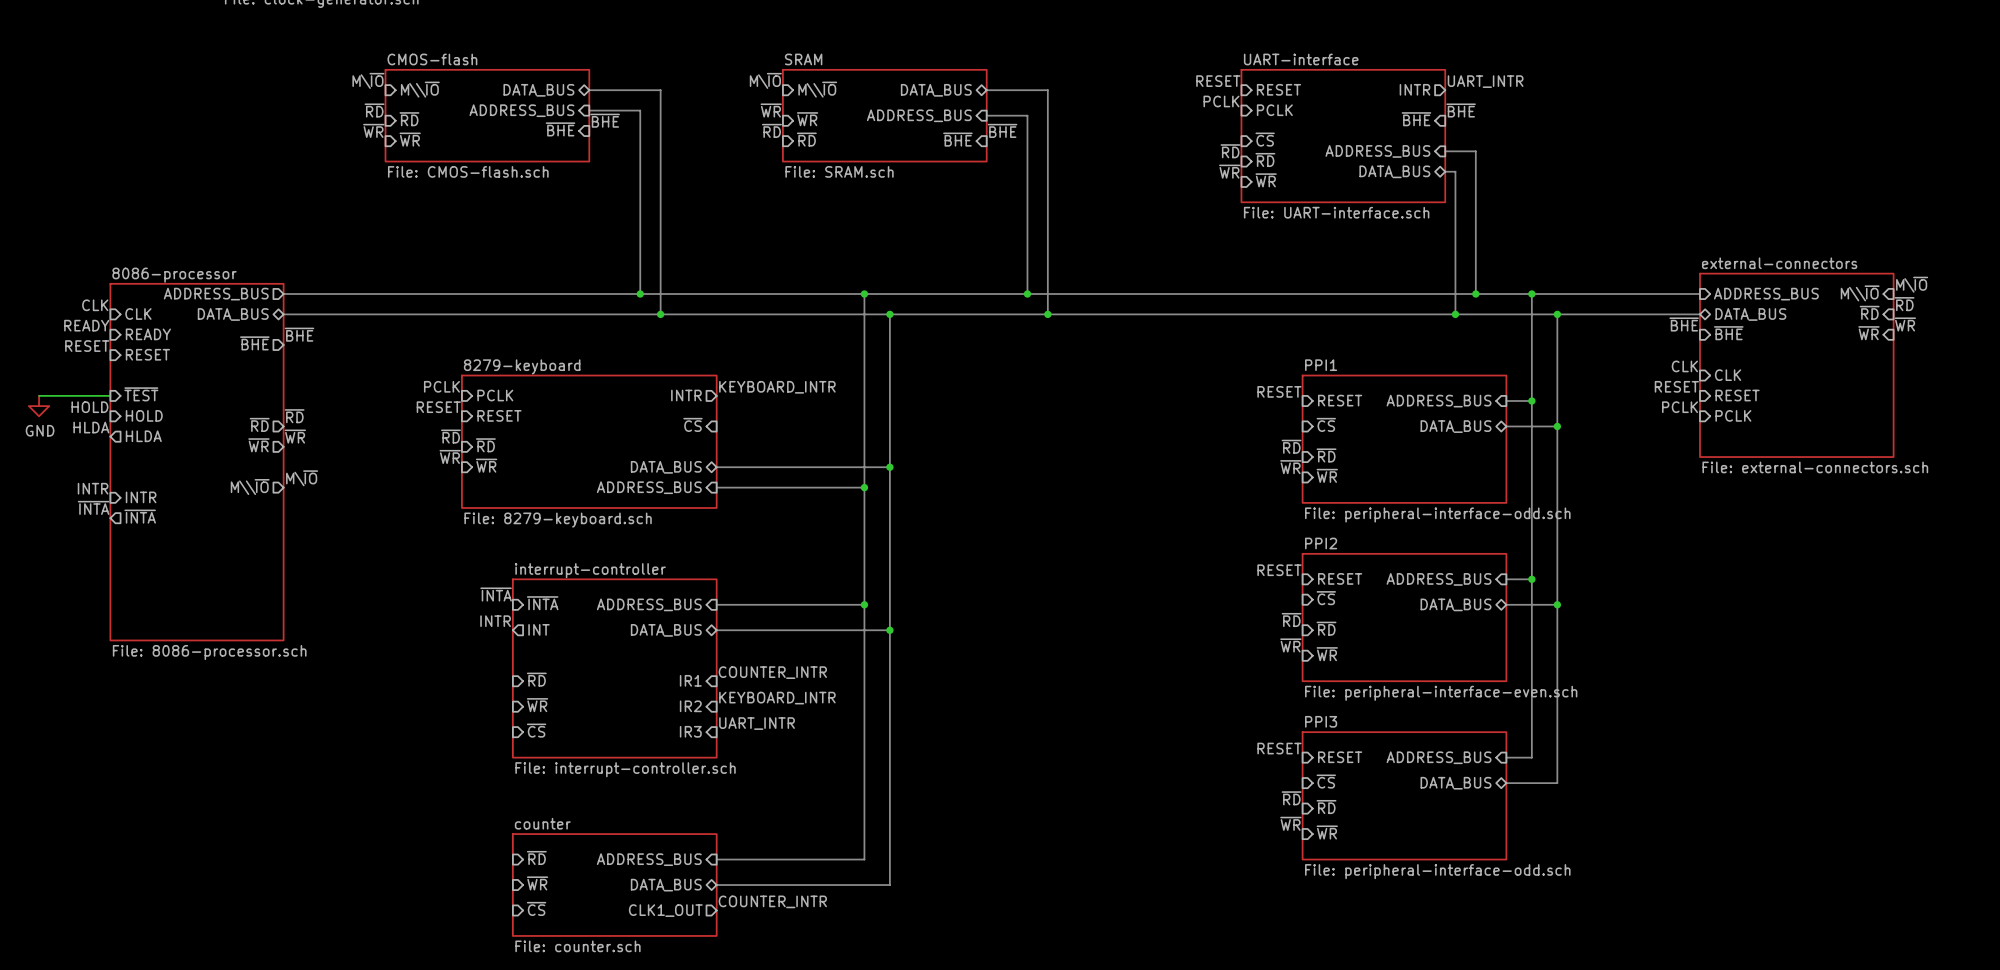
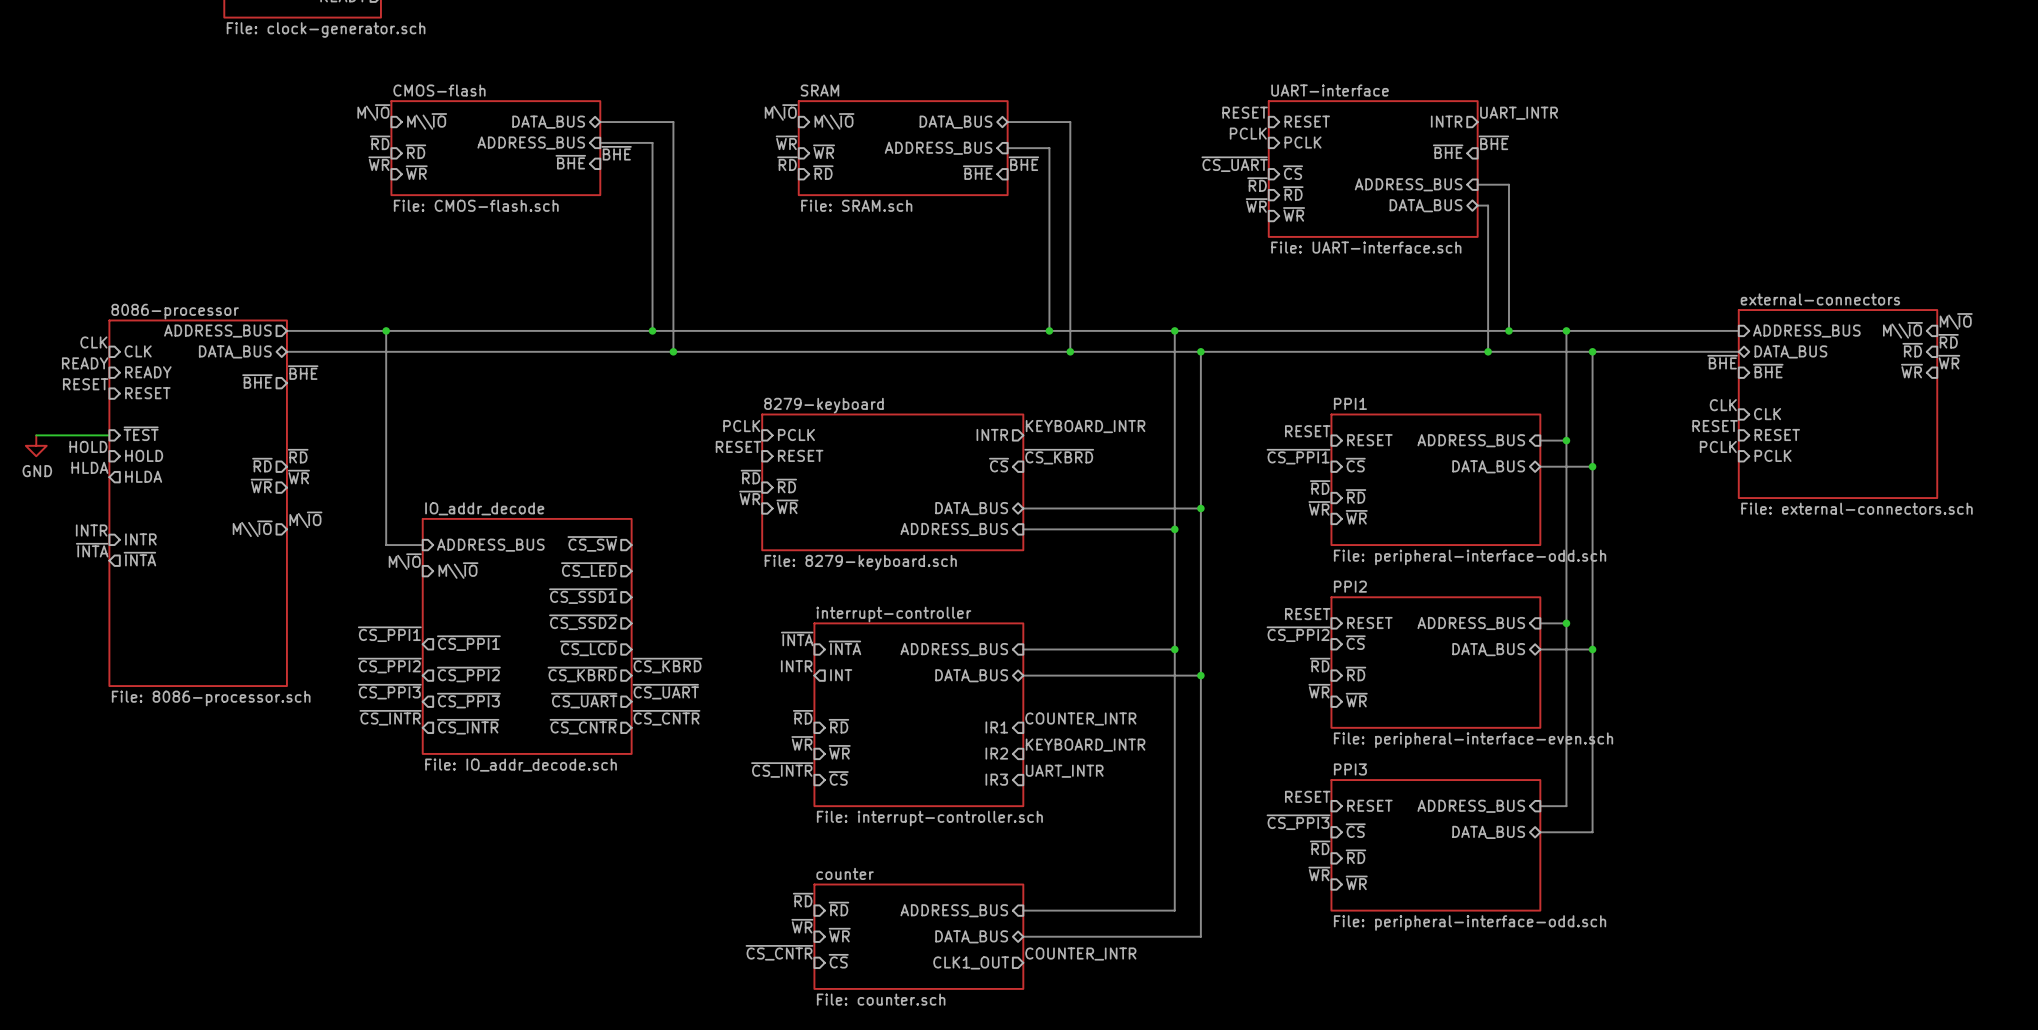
label: none -> ~{CS_UART} (1234, 164)
bus: none -> (386, 330) (386, 545) (422, 545)
junction: none -> (386, 330)
bus: (864, 294) (864, 859) (716, 859) -> none
junction: (864, 294) -> none
bus: none -> (1174, 330) (1174, 910) (1023, 910)
junction: none -> (1174, 330)
bus: (889, 314) (889, 885) (716, 885) -> none
junction: (889, 314) -> none
bus: none -> (1200, 351) (1200, 936) (1023, 936)
junction: none -> (1200, 351)
label: PCLK (441, 386) -> none
label: none -> PCLK (741, 426)
label: KEYBOARD_INTR (777, 387) -> none
label: none -> KEYBOARD_INTR (1085, 426)
sheet pin: PCLK (495, 395) -> none
sheet pin: INTR (686, 395) -> none
sheet pin: none -> PCLK (796, 434)
sheet pin: none -> INTR (992, 434)
label: RESET (438, 407) -> none
label: none -> RESET (738, 446)
sheet pin: RESET (499, 415) -> none
sheet pin: none -> RESET (800, 455)
label: none -> ~{CS_KBRD} (1059, 456)
label: none -> ~{CS_PPI1} (1298, 456)
sheet pin: ~{CS} (692, 424) -> none
sheet pin: none -> ~{CS} (999, 465)
label: ~{RD} (450, 436) -> none
label: none -> ~{RD} (750, 477)
sheet 8279-keyboard position: (589, 441) -> (892, 482)
sheet pin: ~{RD} (485, 445) -> none
sheet pin: none -> ~{RD} (786, 486)
label: ~{WR} (450, 456) -> none
label: none -> ~{WR} (750, 497)
sheet pin: ~{WR} (486, 465) -> none
sheet pin: none -> ~{WR} (787, 506)
sheet pin: DATA_BUS (666, 467) -> none
bus: (716, 467) (889, 467) -> none
junction: (889, 467) -> none
sheet pin: none -> DATA_BUS (971, 508)
bus: none -> (1023, 508) (1200, 508)
junction: none -> (1200, 508)
sheet pin: ADDRESS_BUS (649, 487) -> none
bus: (716, 487) (864, 487) -> none
junction: (864, 487) -> none
sheet pin: none -> ADDRESS_BUS (954, 529)
bus: none -> (1023, 529) (1174, 529)
junction: none -> (1174, 529)
sheet pin: none -> ~{CS_SW} (592, 543)
sheet pin: none -> ADDRESS_BUS (490, 545)
label: none -> M\~{IO} (405, 561)
sheet pin: none -> M\\~{IO} (458, 570)
sheet pin: none -> ~{CS_LED} (589, 570)
sheet pin: none -> ~{CS_SSD1} (583, 596)
sheet pin: none -> ~{CS_SSD2} (583, 622)
label: none -> ~{CS_PPI1} (389, 634)
label: none -> ~{CS_PPI2} (1298, 634)
sheet IO_addr_decode: none -> File: IO_addr_decode.sch (527, 636)
label: ~{INTA} (496, 594) -> none
label: none -> ~{INTA} (797, 638)
sheet pin: none -> ~{CS_PPI1} (468, 643)
sheet pin: ~{INTA} (542, 603) -> none
sheet pin: none -> ~{CS_LCD} (588, 648)
sheet pin: none -> ~{INTA} (844, 647)
sheet pin: ADDRESS_BUS (649, 604) -> none
bus: (716, 604) (864, 604) -> none
junction: (864, 604) -> none
sheet pin: none -> ADDRESS_BUS (954, 649)
bus: none -> (1023, 649) (1174, 649)
junction: none -> (1174, 649)
label: none -> ~{CS_PPI2} (389, 665)
label: none -> ~{CS_KBRD} (667, 665)
label: INTR (495, 621) -> none
label: none -> INTR (796, 666)
sheet pin: none -> ~{CS_PPI2} (468, 674)
sheet pin: INT (539, 629) -> none
sheet pin: none -> ~{CS_KBRD} (582, 674)
sheet pin: none -> INT (841, 675)
sheet pin: DATA_BUS (666, 630) -> none
bus: (716, 630) (889, 630) -> none
junction: (889, 630) -> none
sheet pin: none -> DATA_BUS (971, 675)
bus: none -> (1023, 675) (1200, 675)
junction: none -> (1200, 675)
label: none -> ~{CS_PPI3} (389, 691)
label: none -> ~{CS_UART} (665, 691)
sheet pin: none -> ~{CS_PPI3} (468, 700)
sheet pin: none -> ~{CS_UART} (584, 700)
sheet interrupt-controller: File: interrupt-controller.sch (614, 668) -> none
sheet interrupt-controller: none -> File: interrupt-controller.sch (918, 714)
label: none -> ~{RD} (803, 717)
label: none -> ~{CS_INTR} (390, 717)
label: none -> ~{CS_CNTR} (666, 717)
label: COUNTER_INTR (772, 672) -> none
label: none -> COUNTER_INTR (1080, 719)
sheet pin: ~{RD} (536, 679) -> none
sheet pin: none -> ~{RD} (838, 726)
sheet pin: none -> ~{CS_INTR} (468, 726)
sheet pin: none -> ~{CS_CNTR} (583, 726)
sheet pin: IR1 (690, 680) -> none
sheet pin: none -> IR1 (996, 727)
label: none -> ~{WR} (802, 743)
label: KEYBOARD_INTR (777, 698) -> none
label: none -> KEYBOARD_INTR (1085, 745)
sheet pin: ~{WR} (537, 705) -> none
sheet pin: none -> ~{WR} (839, 752)
sheet pin: IR2 (690, 706) -> none
sheet pin: none -> IR2 (996, 753)
label: none -> ~{CS_INTR} (782, 770)
label: UART_INTR (757, 723) -> none
label: none -> UART_INTR (1064, 771)
sheet pin: ~{CS} (536, 730) -> none
sheet pin: none -> ~{CS} (838, 778)
sheet pin: IR3 (690, 731) -> none
sheet pin: none -> IR3 (996, 779)
label: none -> ~{CS_PPI3} (1298, 822)
label: none -> ~{RD} (803, 900)
sheet pin: ~{RD} (536, 857) -> none
sheet pin: none -> ~{RD} (838, 909)
sheet pin: ADDRESS_BUS (649, 859) -> none
sheet pin: none -> ADDRESS_BUS (954, 910)
label: none -> ~{WR} (802, 926)
sheet pin: ~{WR} (537, 883) -> none
sheet pin: none -> ~{WR} (839, 935)
sheet counter: File: counter.sch (614, 885) -> none
sheet pin: DATA_BUS (666, 885) -> none
sheet counter: none -> File: counter.sch (918, 936)
sheet pin: none -> DATA_BUS (971, 936)
label: none -> ~{CS_CNTR} (779, 952)
label: COUNTER_INTR (772, 901) -> none
label: none -> COUNTER_INTR (1080, 954)
sheet pin: ~{CS} (536, 908) -> none
sheet pin: none -> ~{CS} (838, 961)
sheet pin: CLK1_OUT (665, 910) -> none
sheet pin: none -> CLK1_OUT (971, 962)

